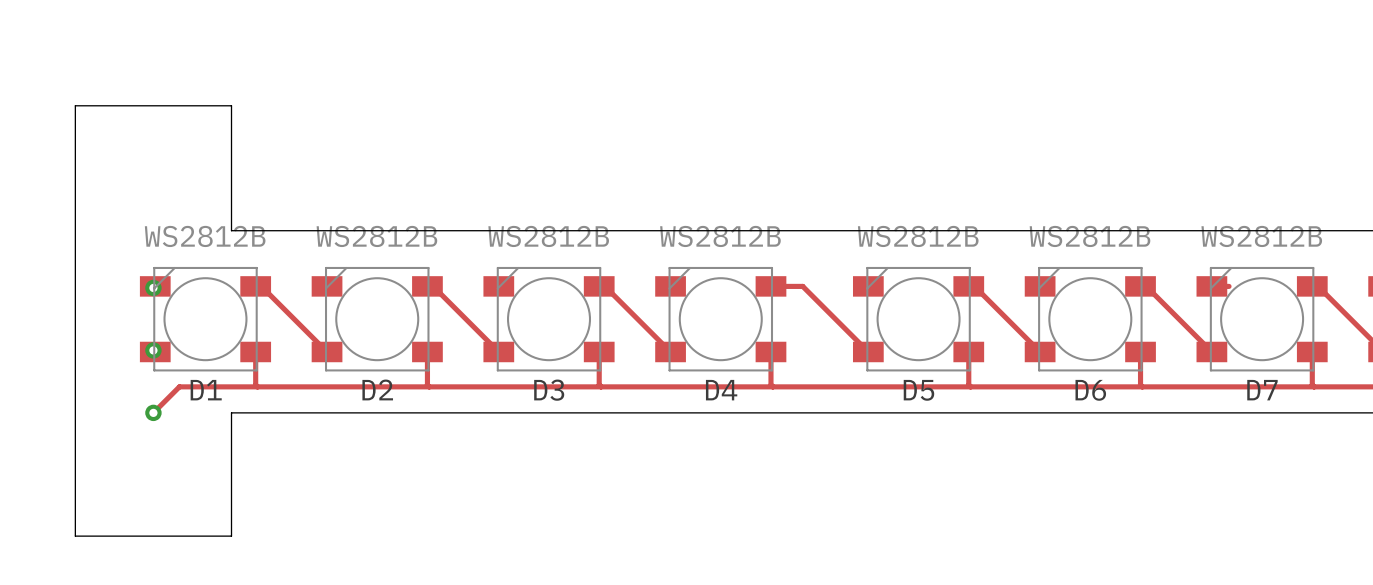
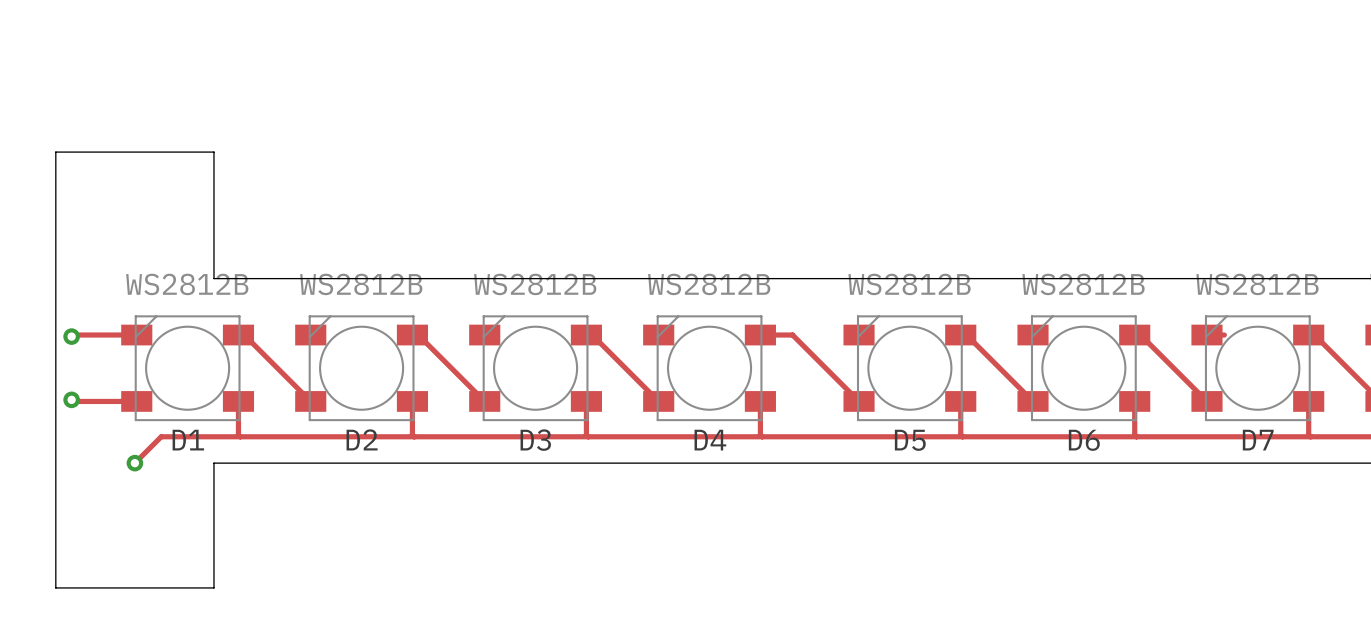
track: none -> (136, 335) (73, 335) (71, 336)
via: none -> (71, 336)
via: (153, 287) -> none
track: none -> (71, 399) (73, 401) (136, 401)
via: none -> (71, 399)
via: (153, 350) -> none

